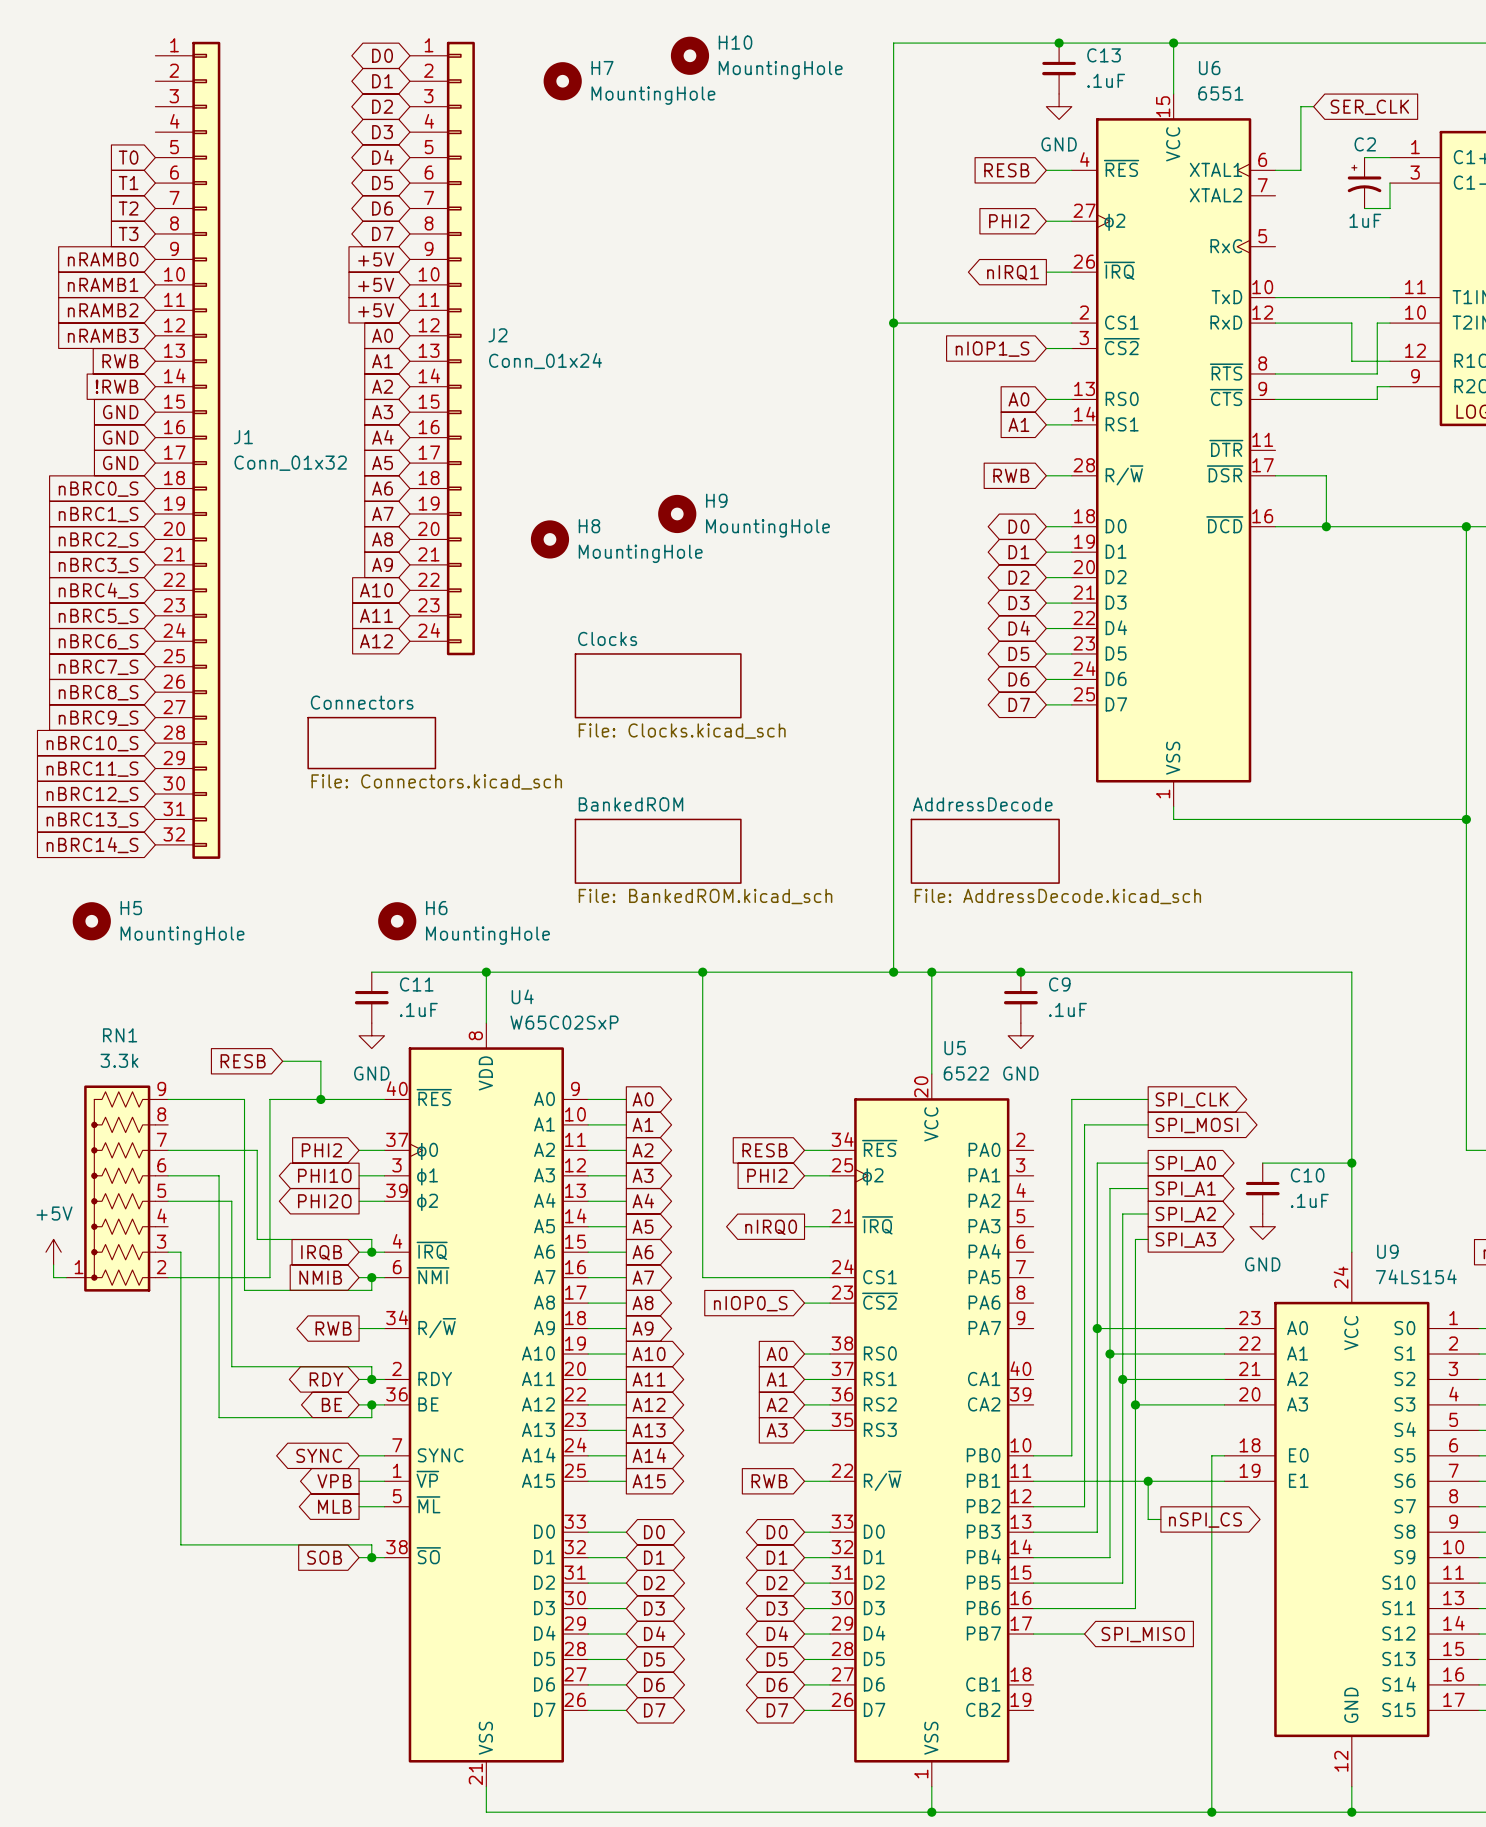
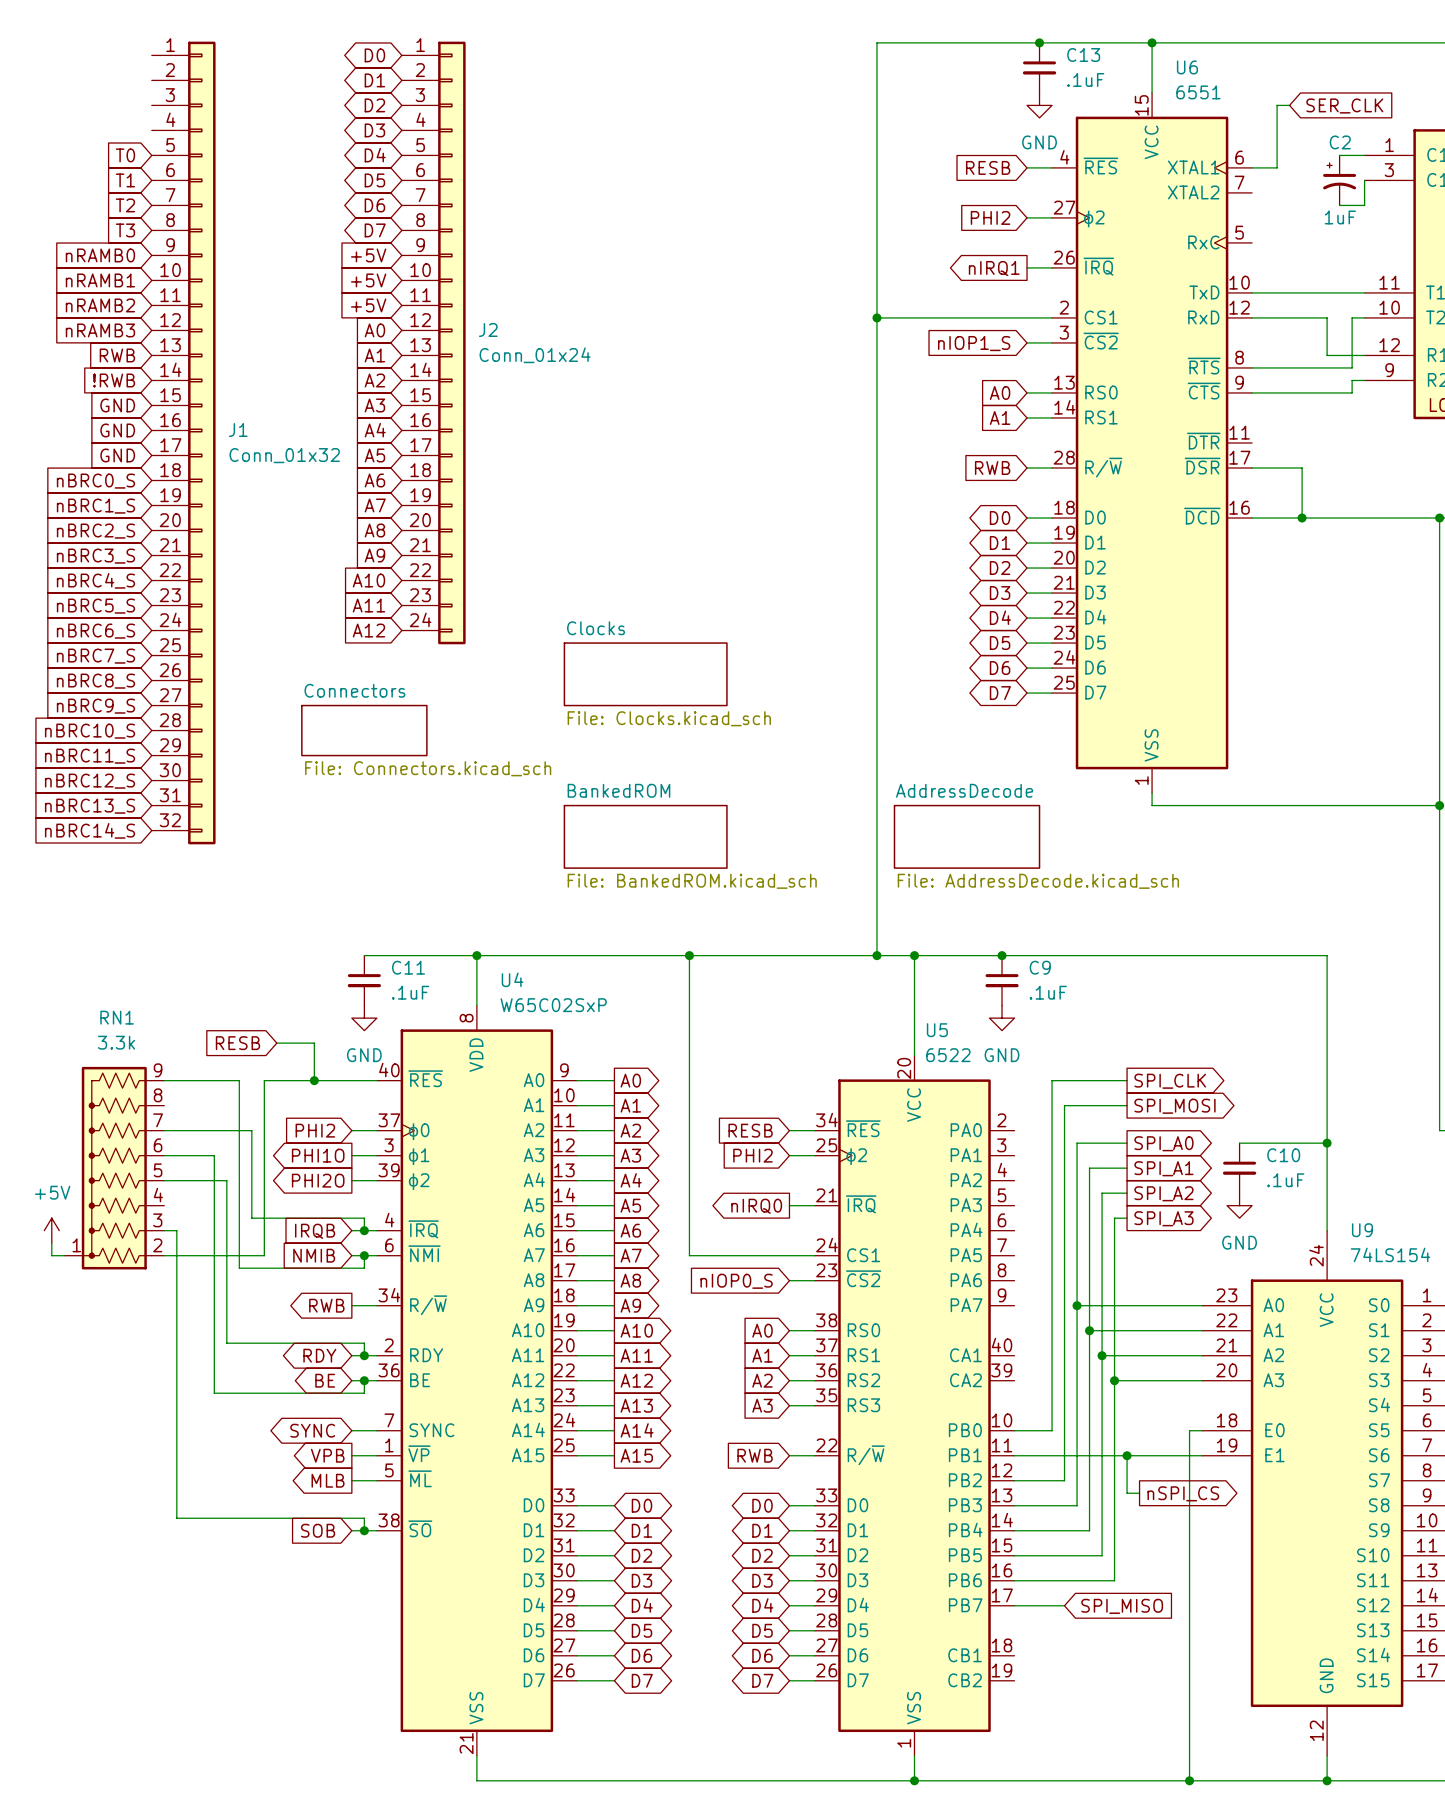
H10: MountingHole (689, 55) -> none
H7: MountingHole (562, 81) -> none
H9: MountingHole (677, 513) -> none
H8: MountingHole (549, 539) -> none
H5: MountingHole (91, 921) -> none
H6: MountingHole (397, 921) -> none

